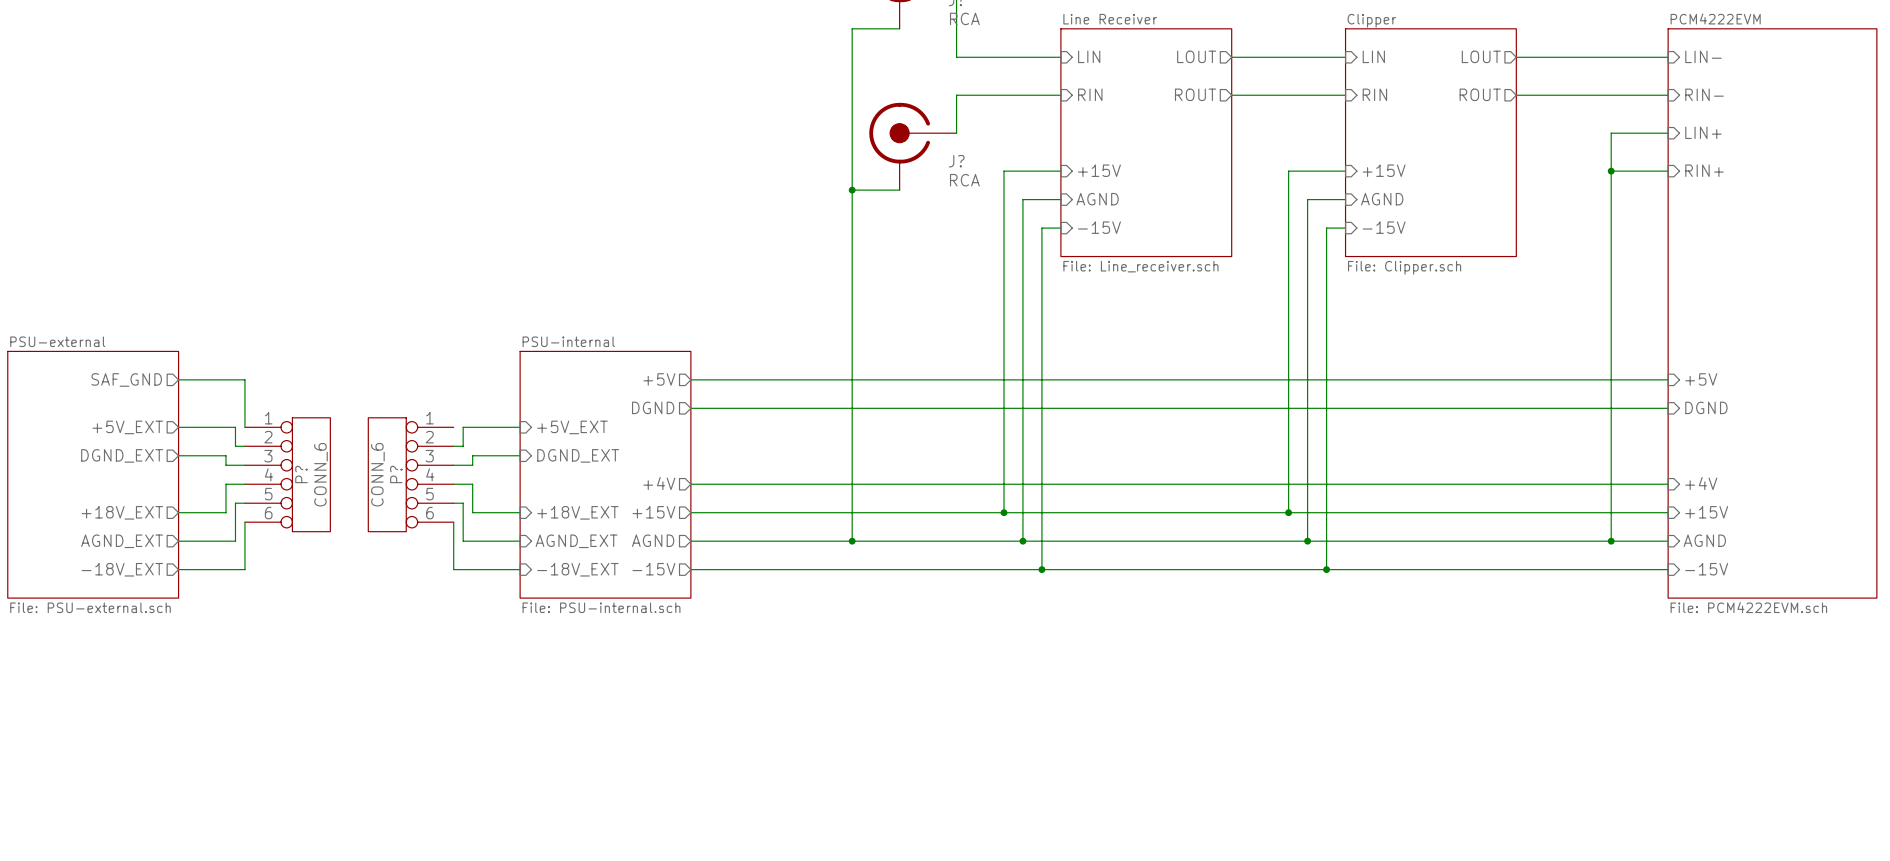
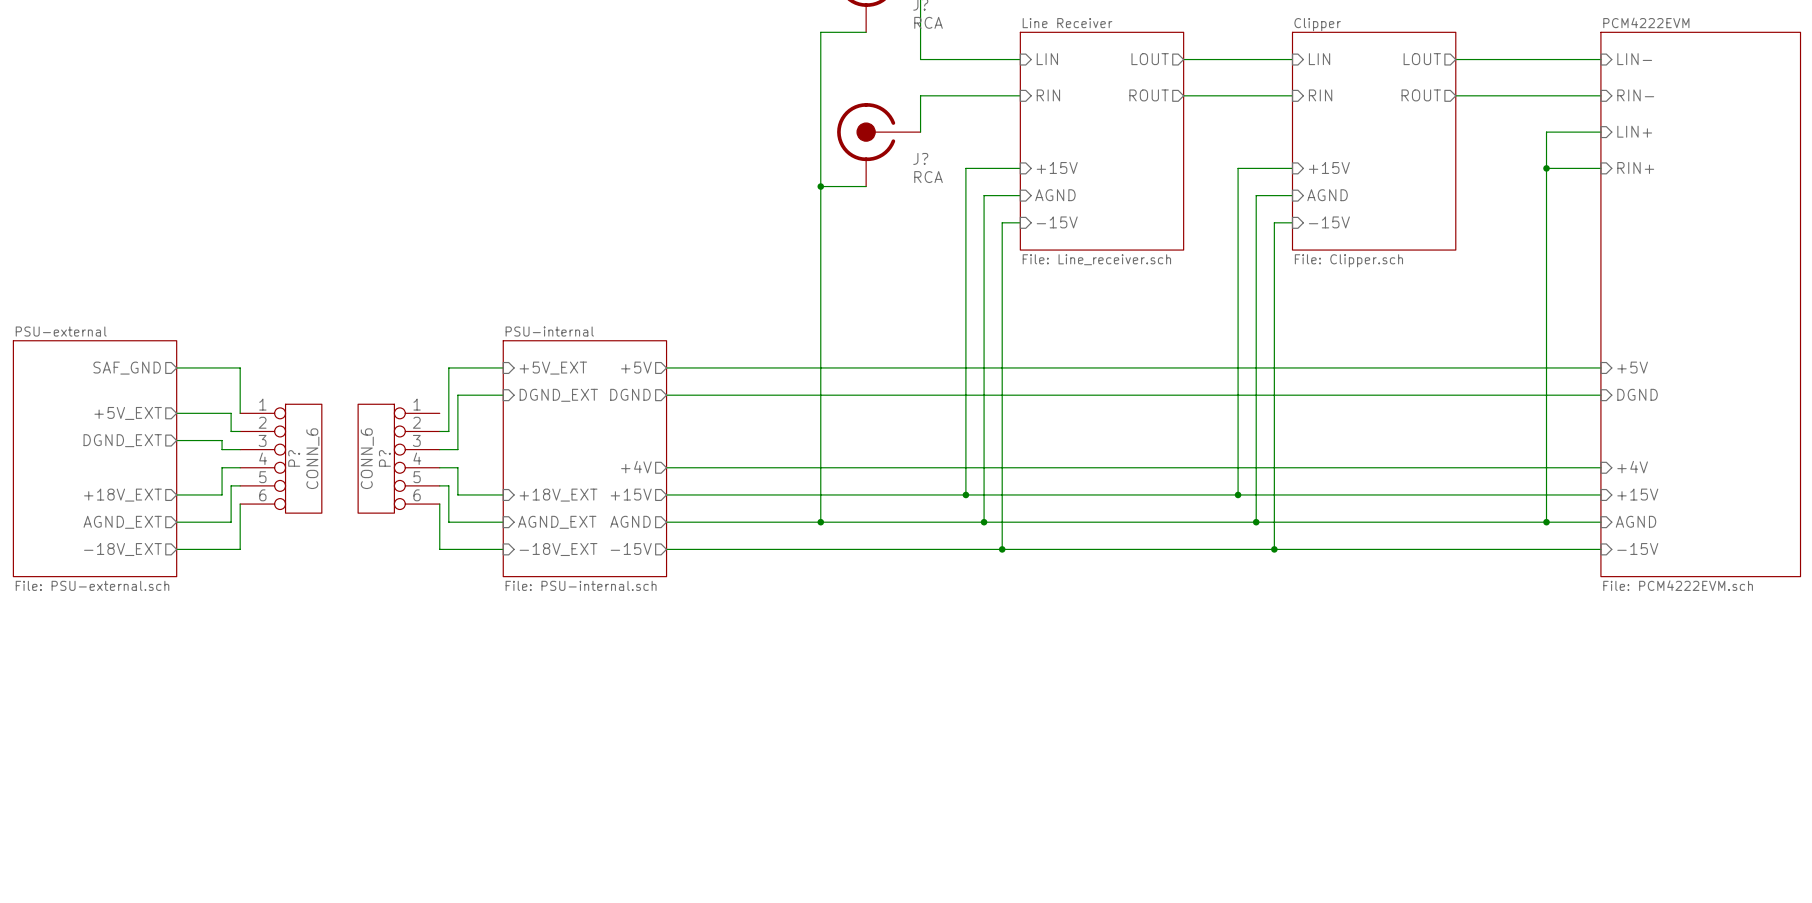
wire: (463, 427) (520, 427) -> (448, 413) (448, 367) (503, 367)
sheet pin position: +5V_EXT (572, 427) -> +5V_EXT (553, 368)
wire: (472, 455) (520, 455) -> (457, 440) (457, 395) (503, 395)
sheet pin position: DGND_EXT (578, 455) -> DGND_EXT (558, 395)

